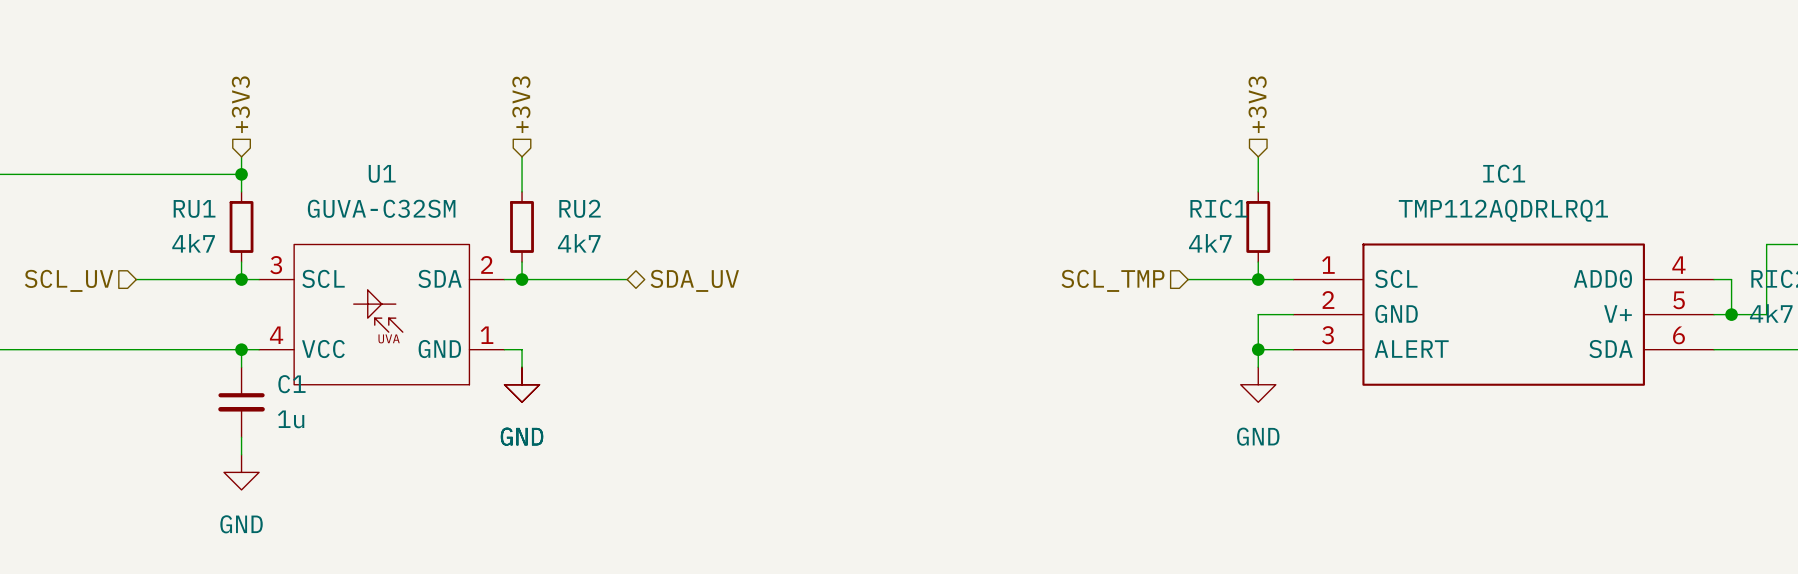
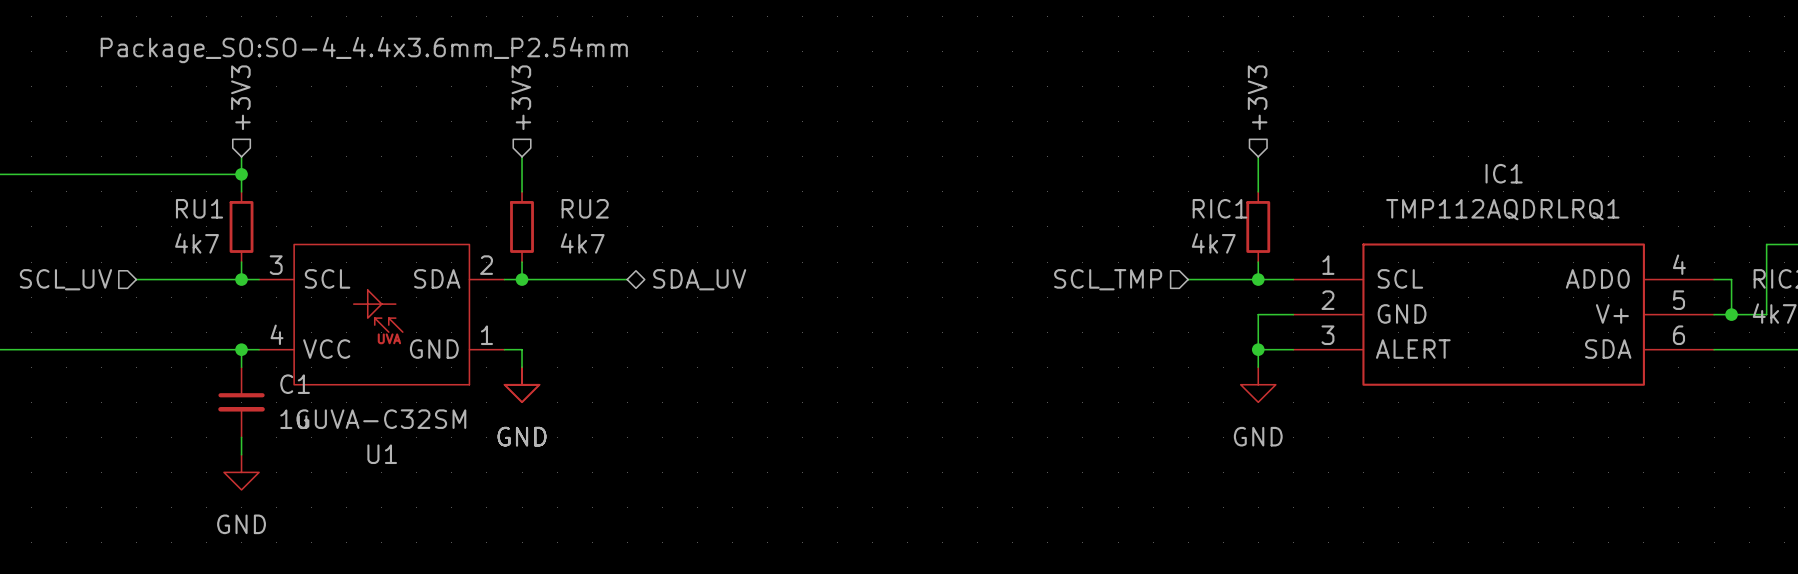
U1 text: none -> Package_SO:SO-4_4.4x3.6mm_P2.54mm (364, 50)
U1 name position: U1 (382, 173) -> U1 (382, 454)
U1 value position: GUVA-C32SM (381, 208) -> GUVA-C32SM (381, 419)

